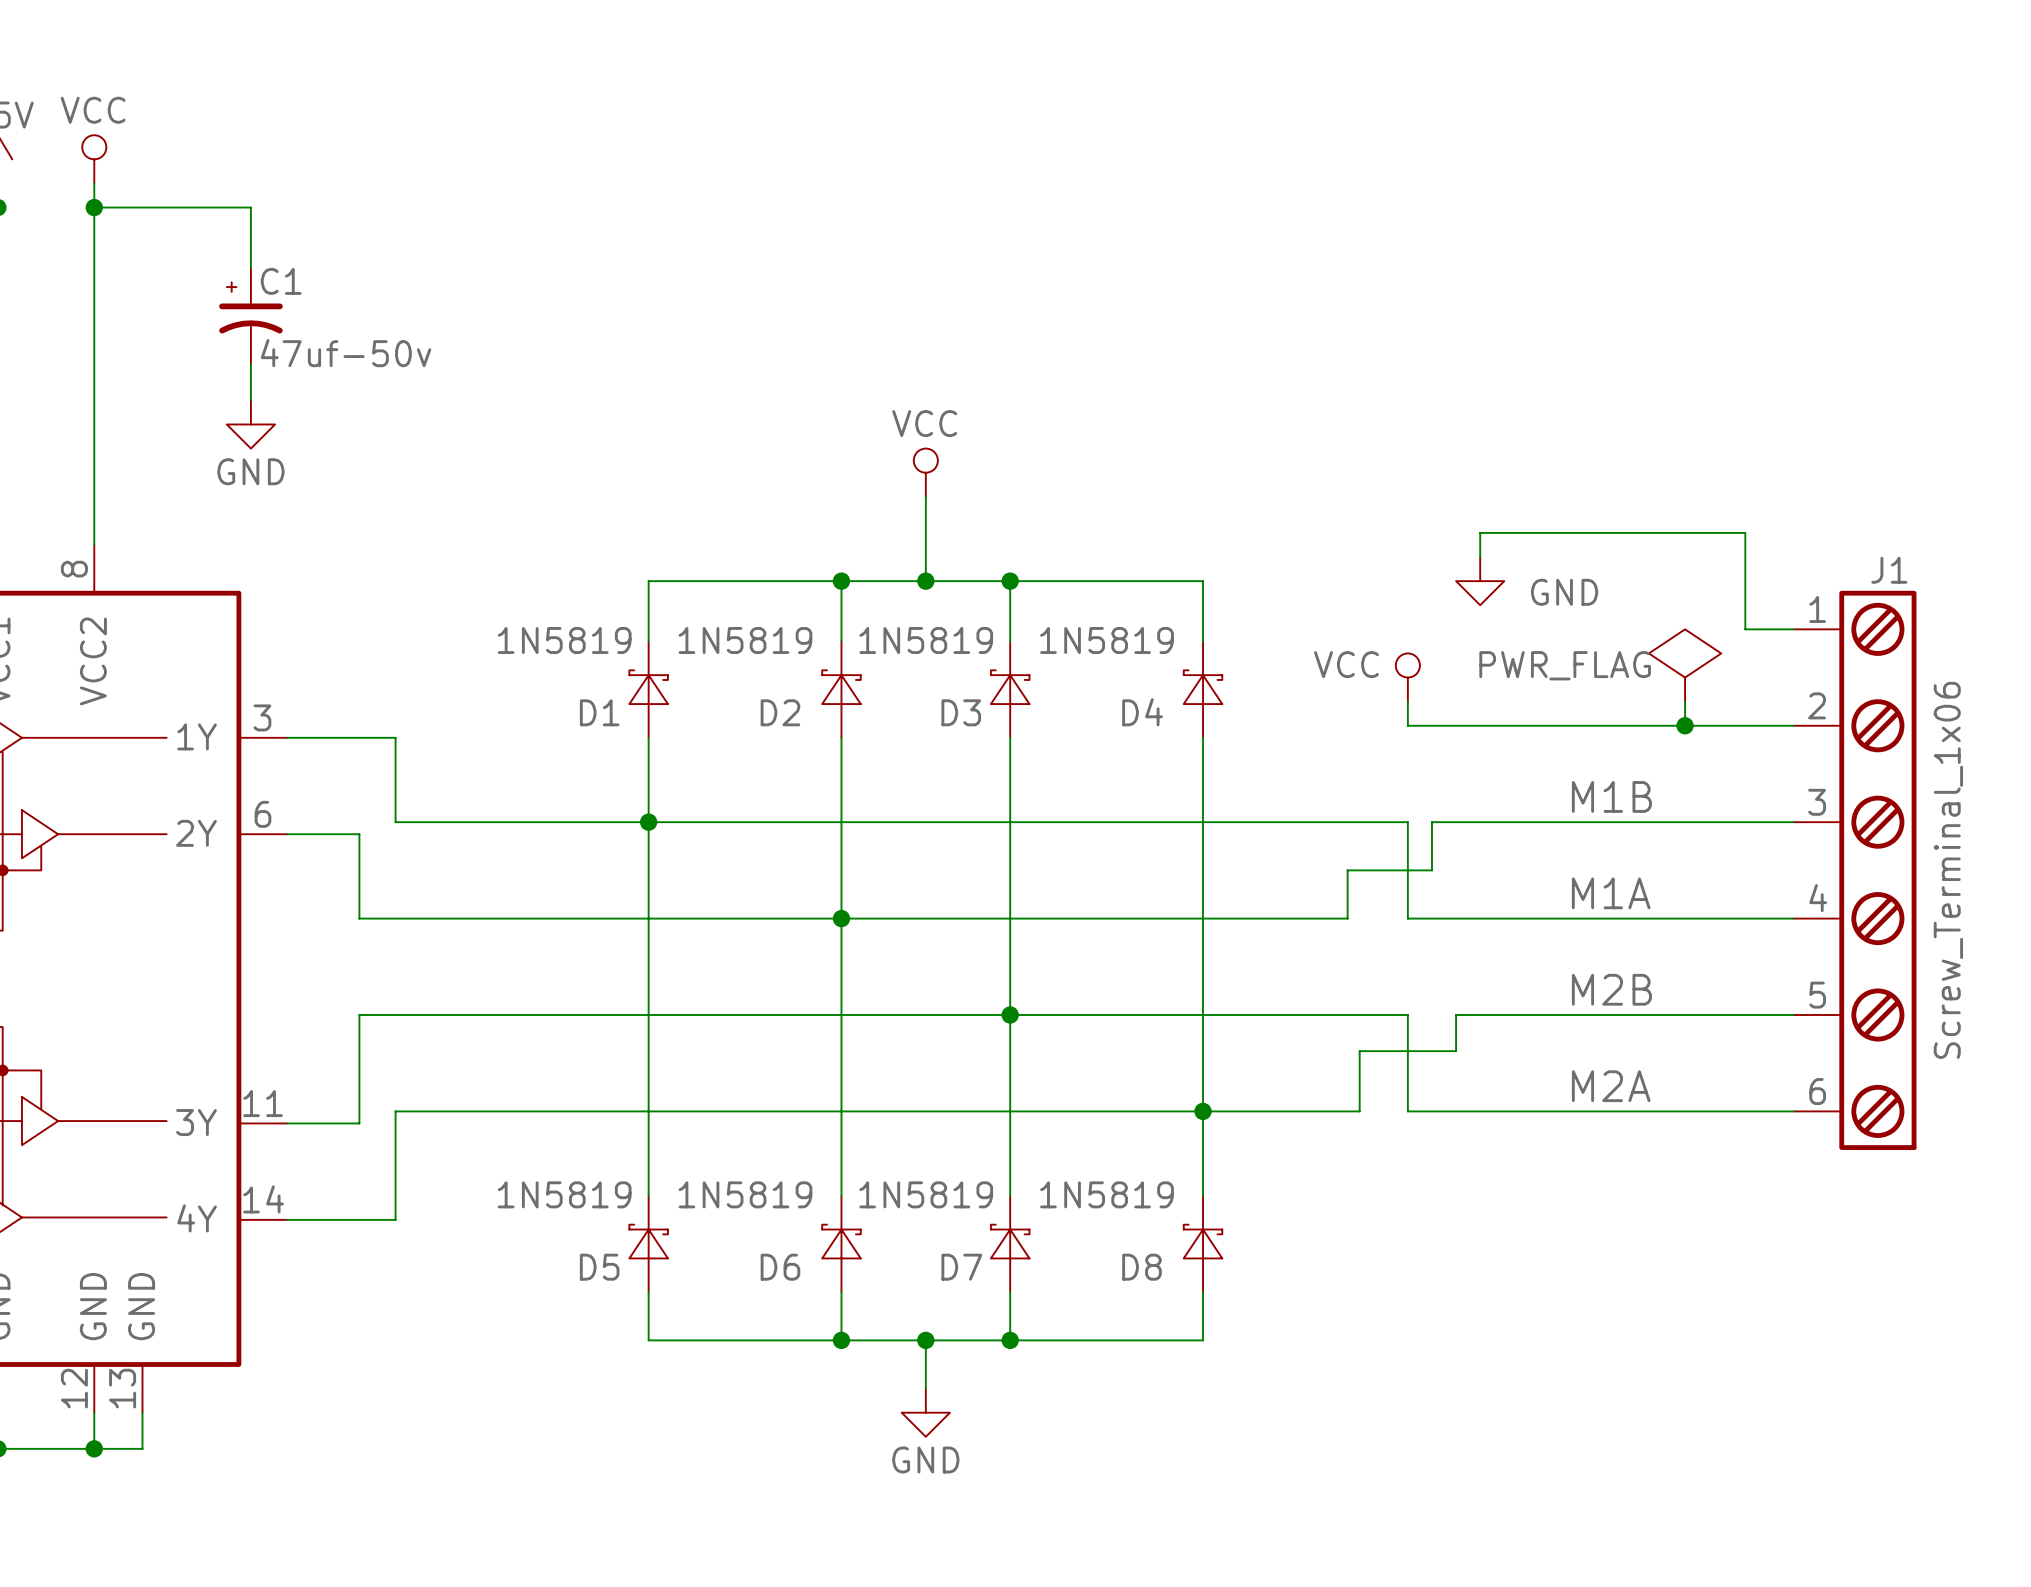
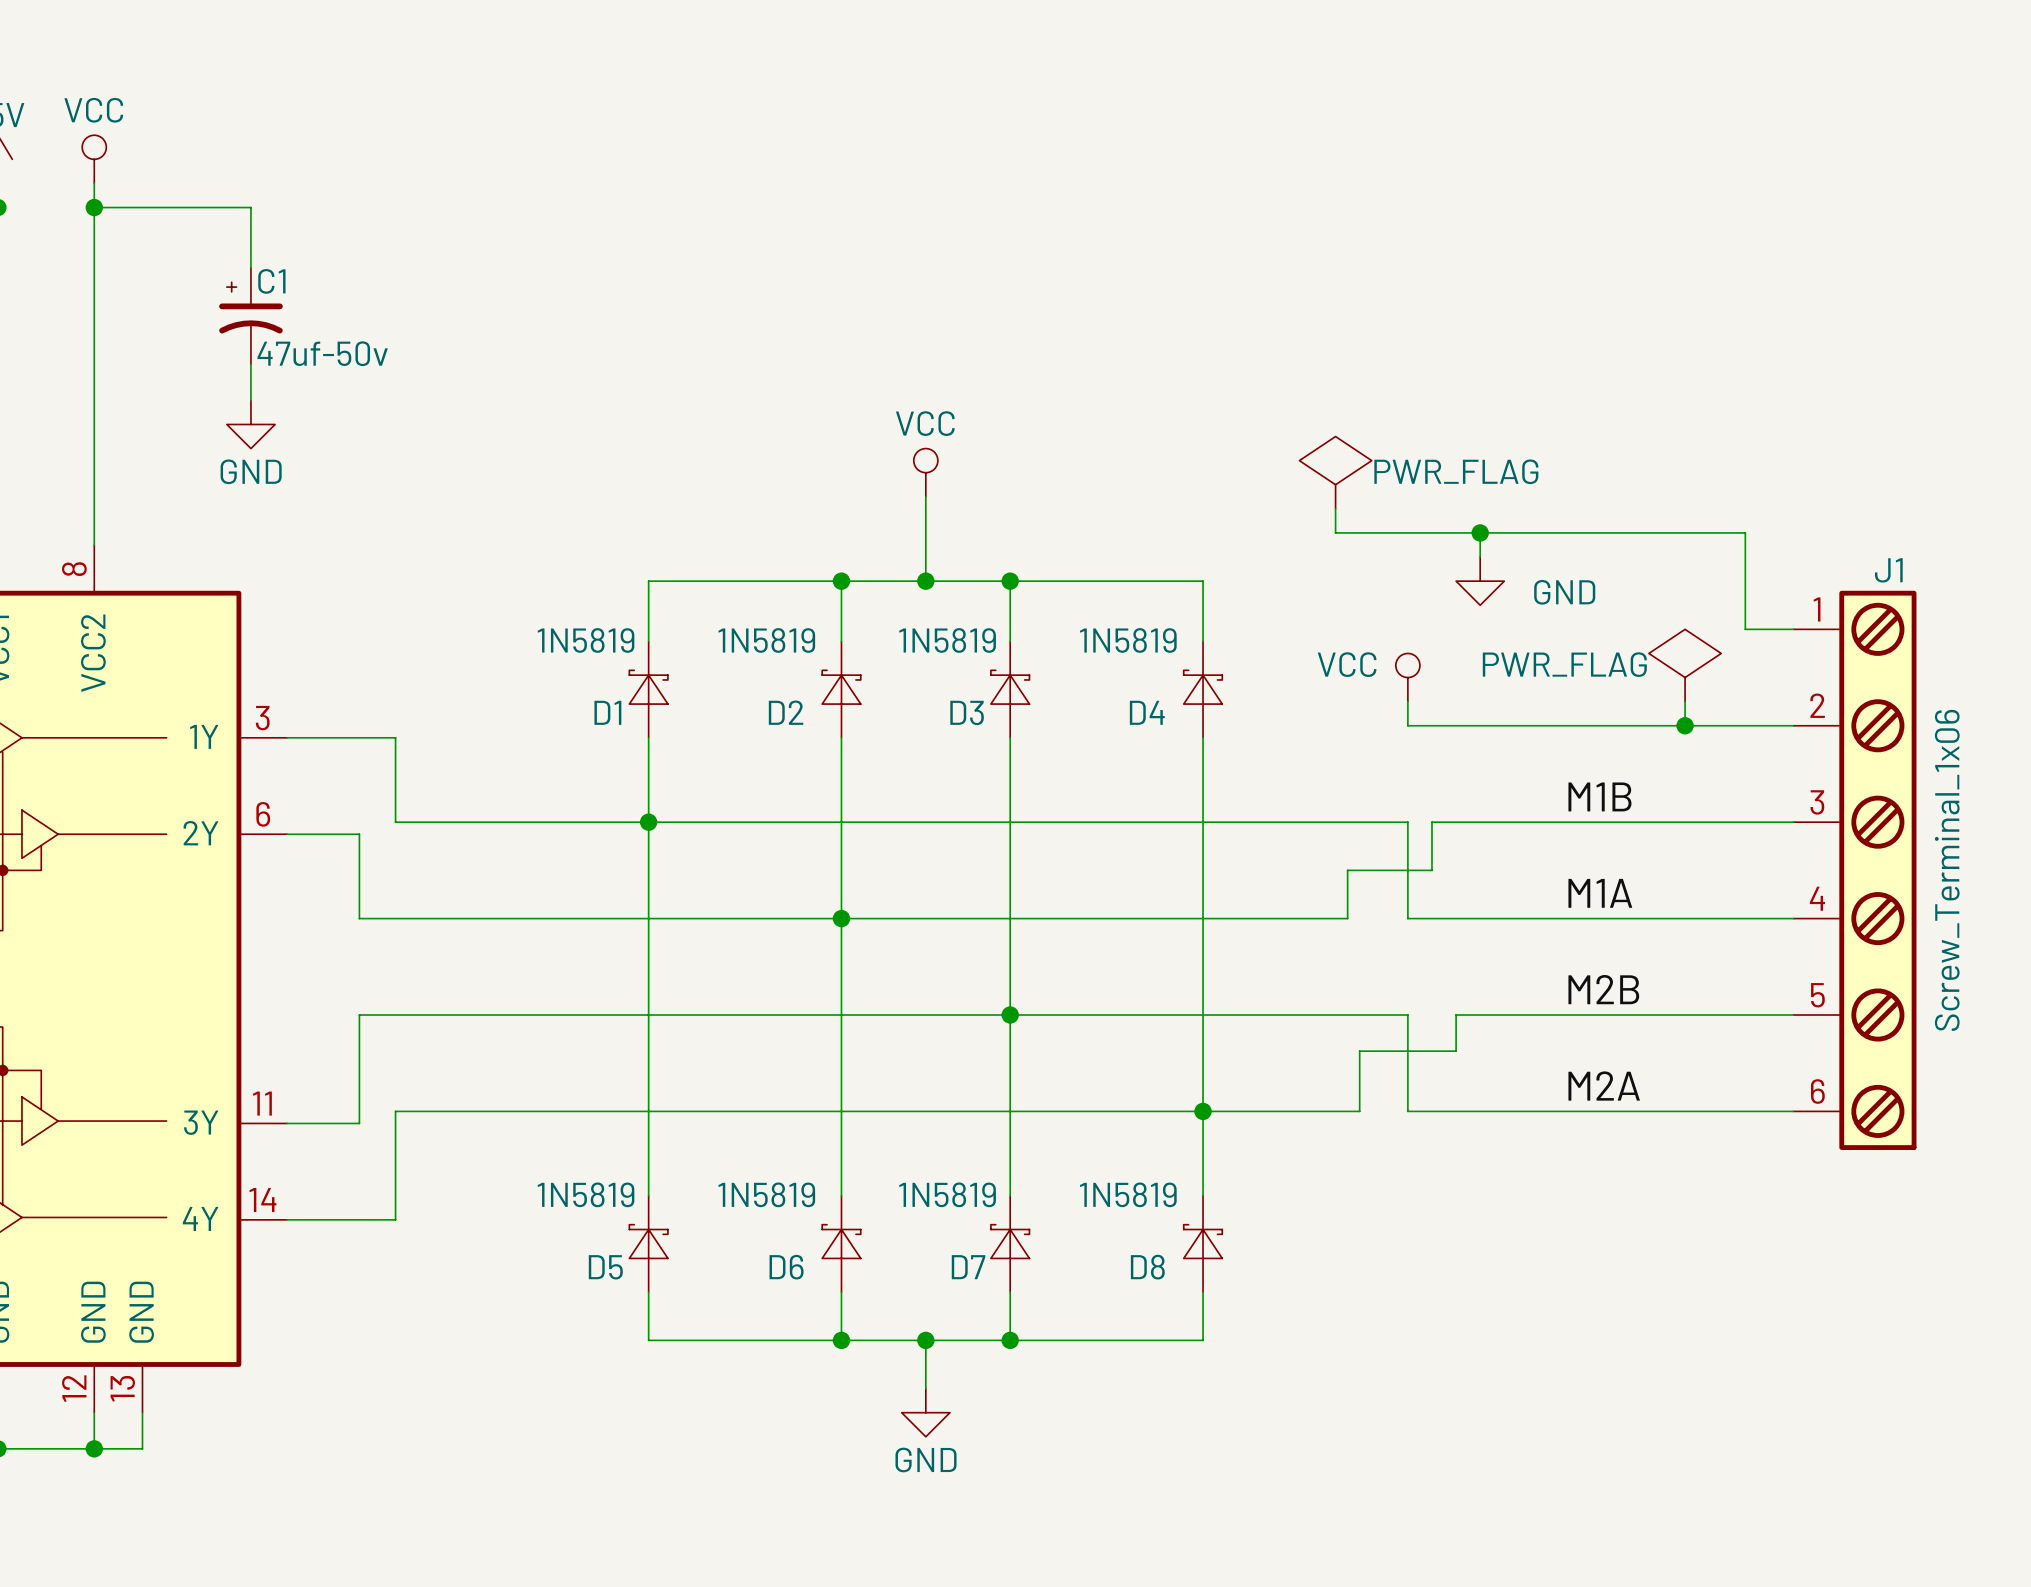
power symbol: none -> PWR_FLAG (1335, 472)
wire: none -> (1335, 508) (1335, 532) (1480, 532)
junction: none -> (1480, 532)

